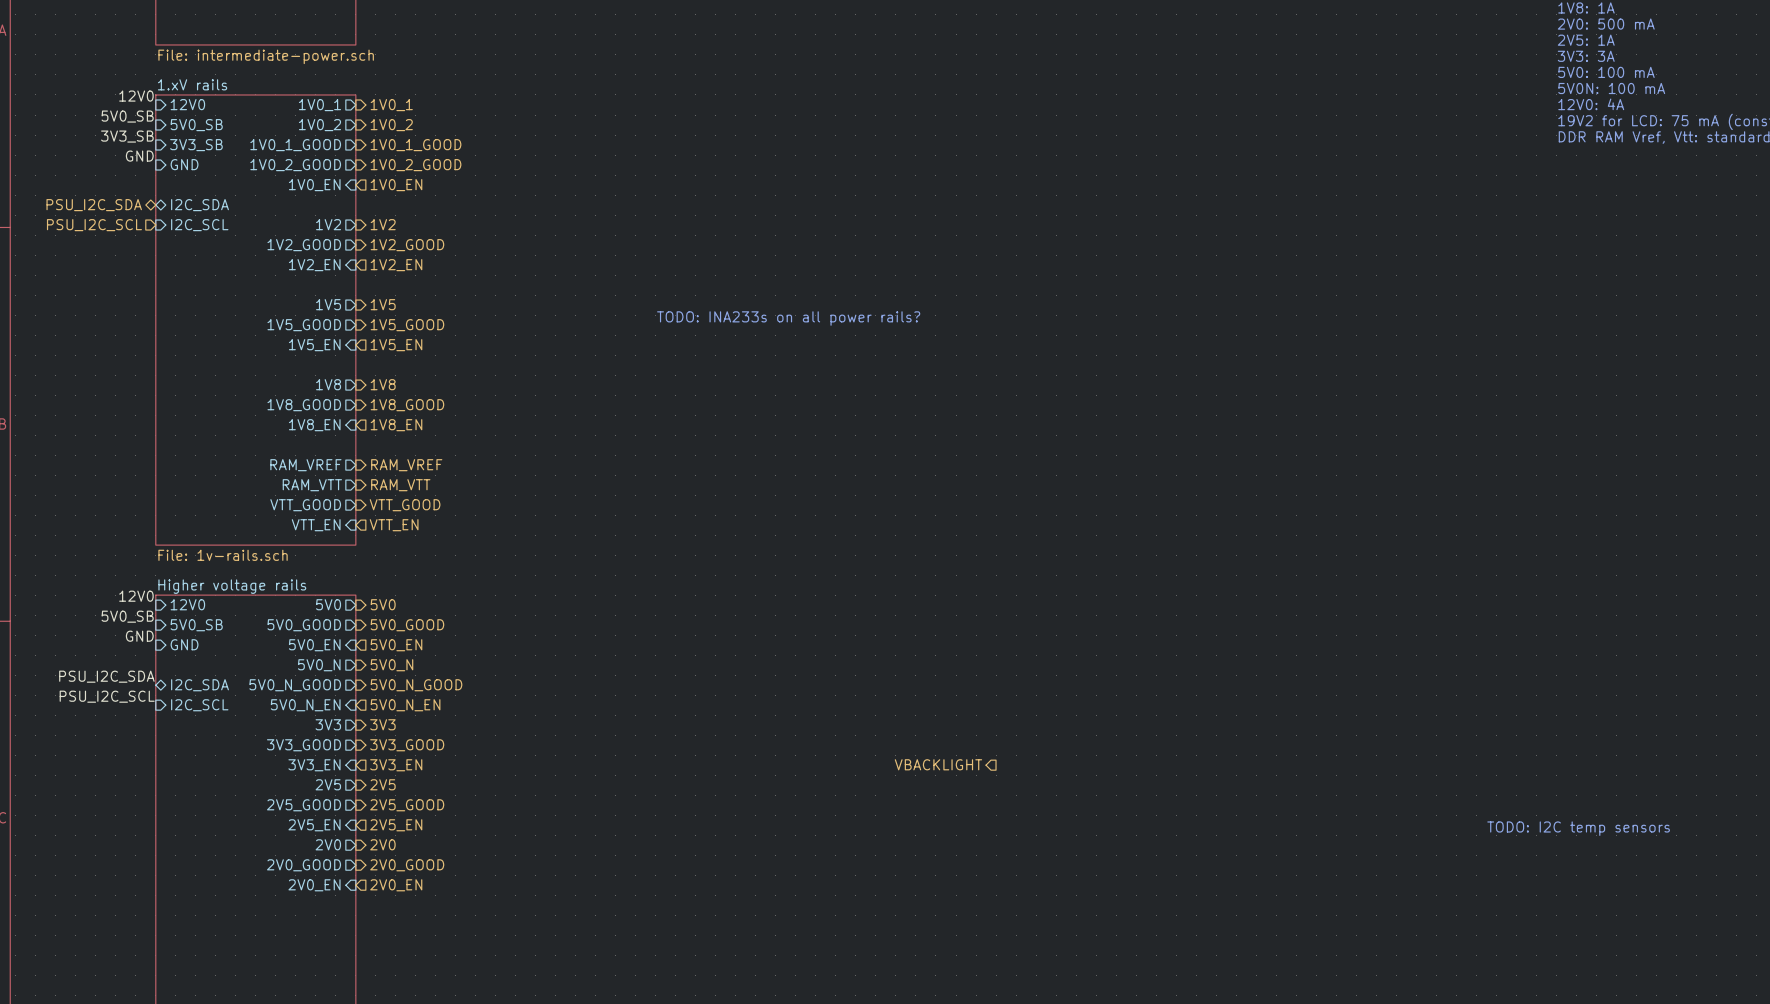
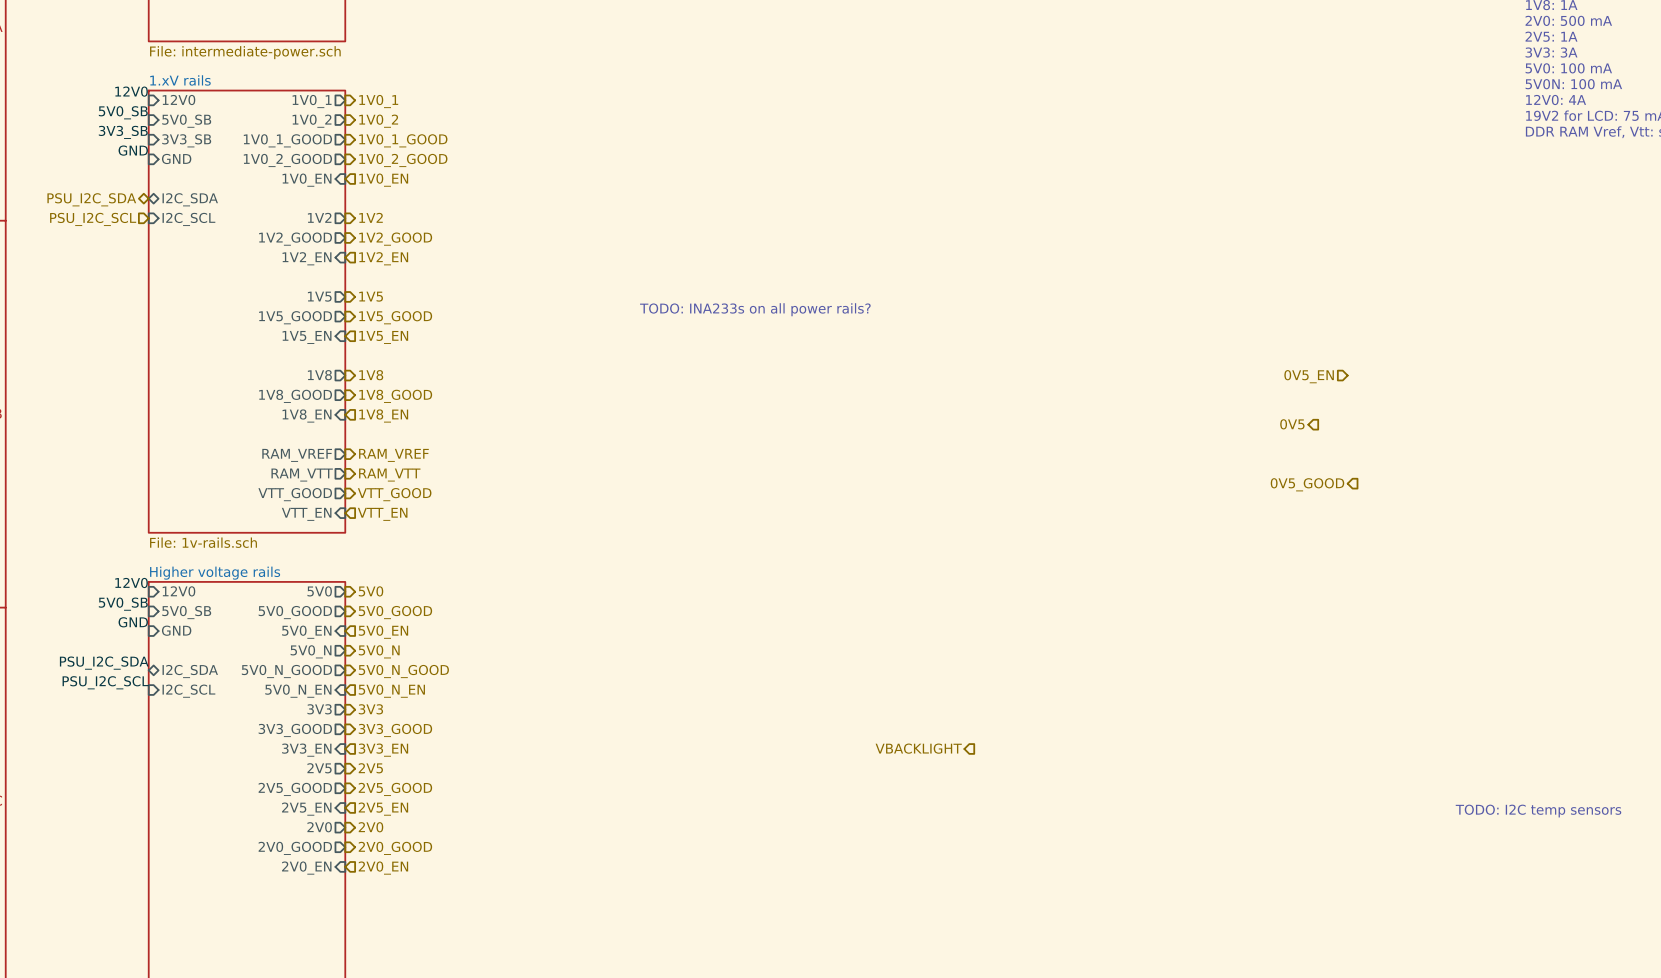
hierarchical label: none -> 0V5_EN (1309, 376)
hierarchical label: none -> 0V5 (1292, 424)
hierarchical label: none -> 0V5_GOOD (1307, 484)

